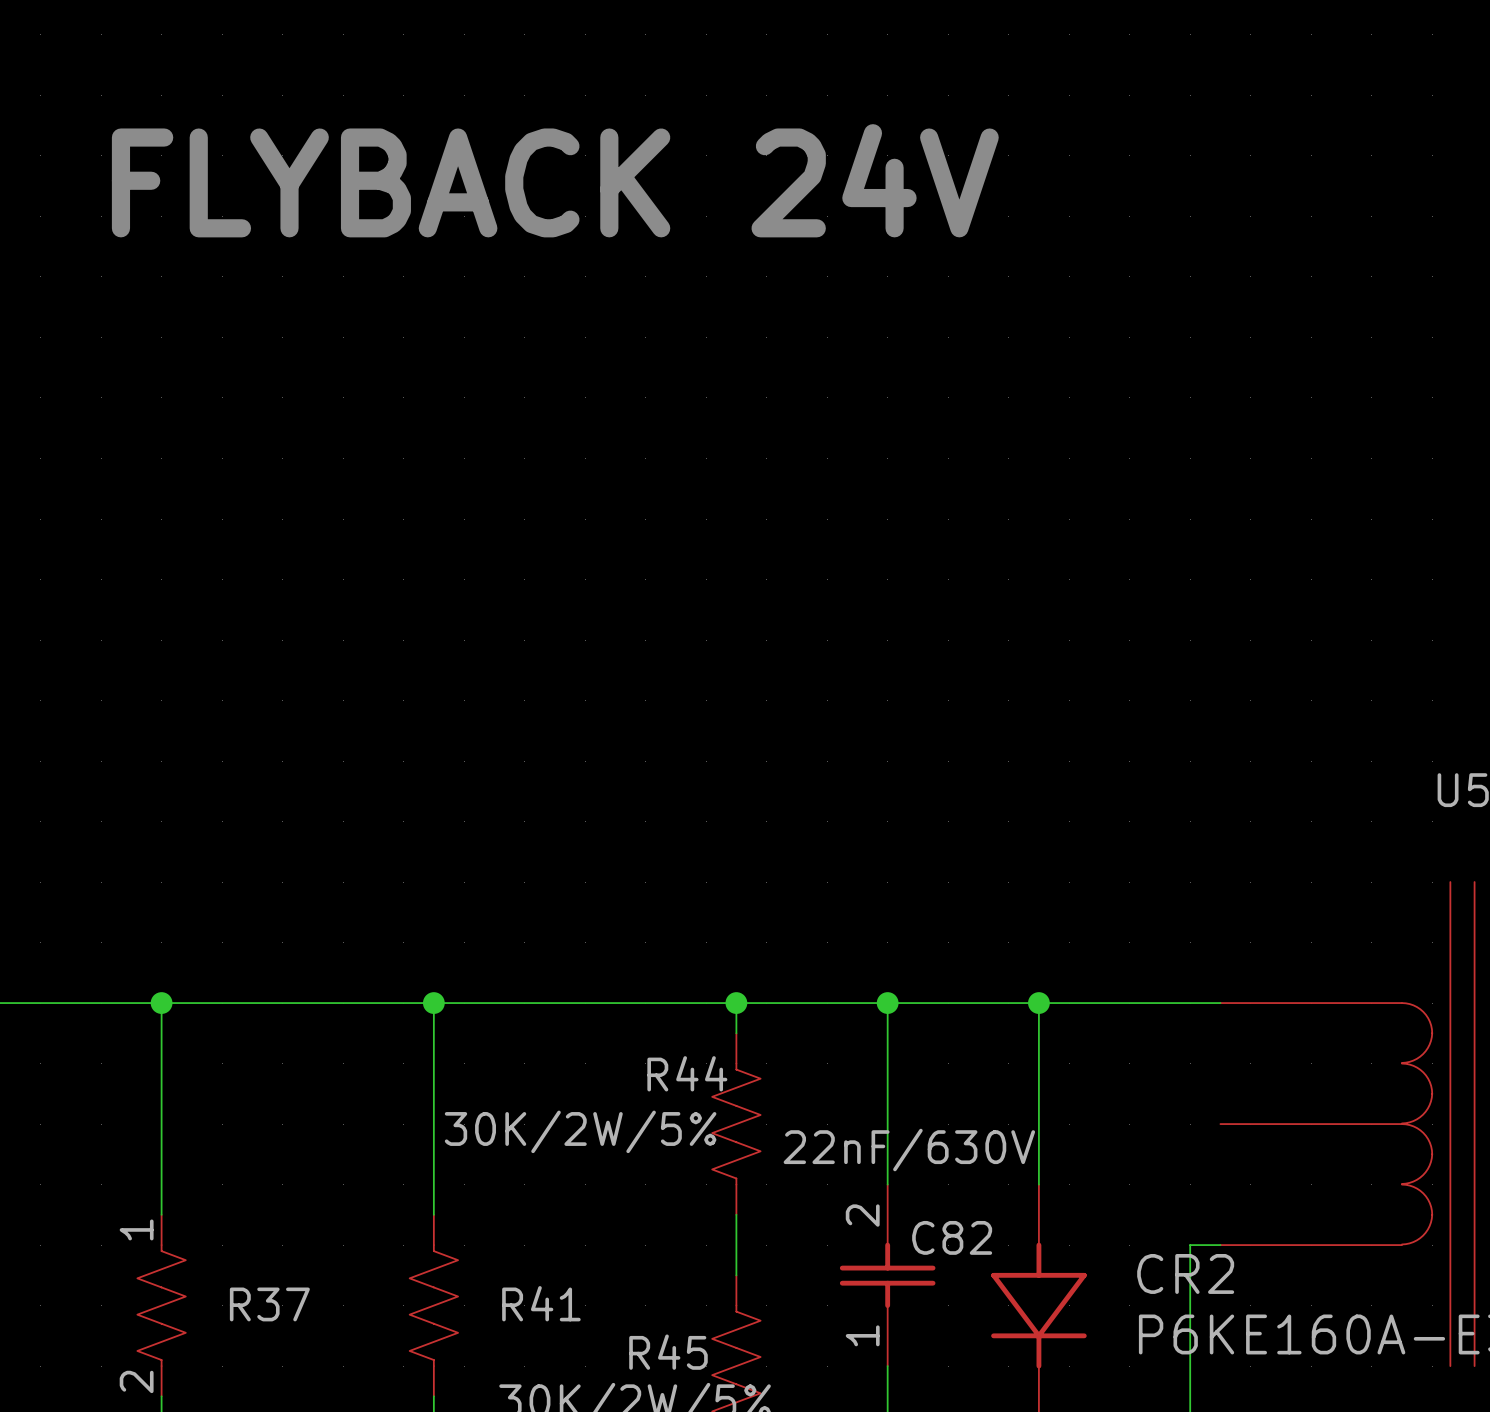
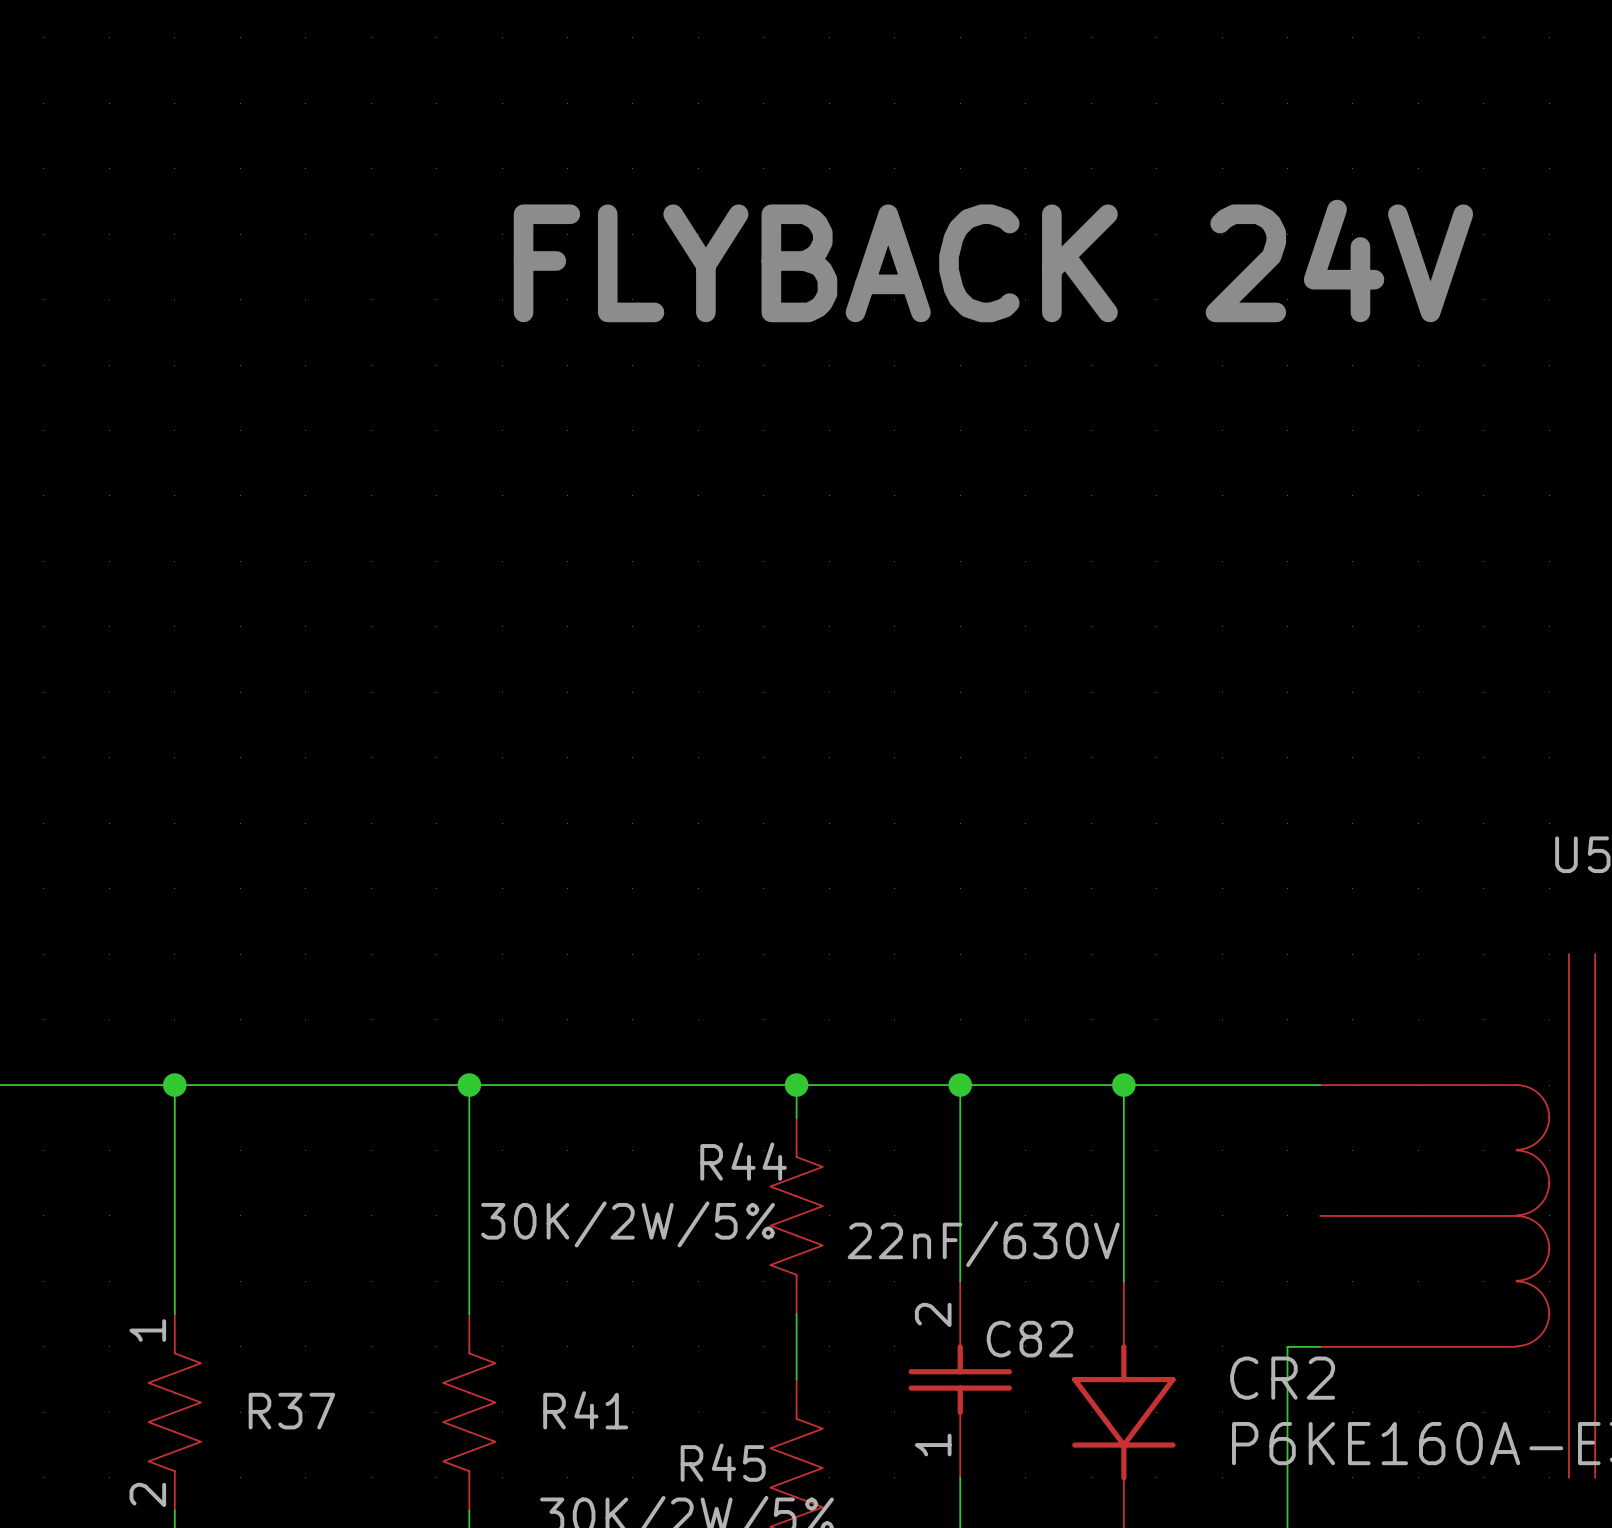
text position: FLYBACK 24V (555, 180) -> FLYBACK 24V (993, 260)

